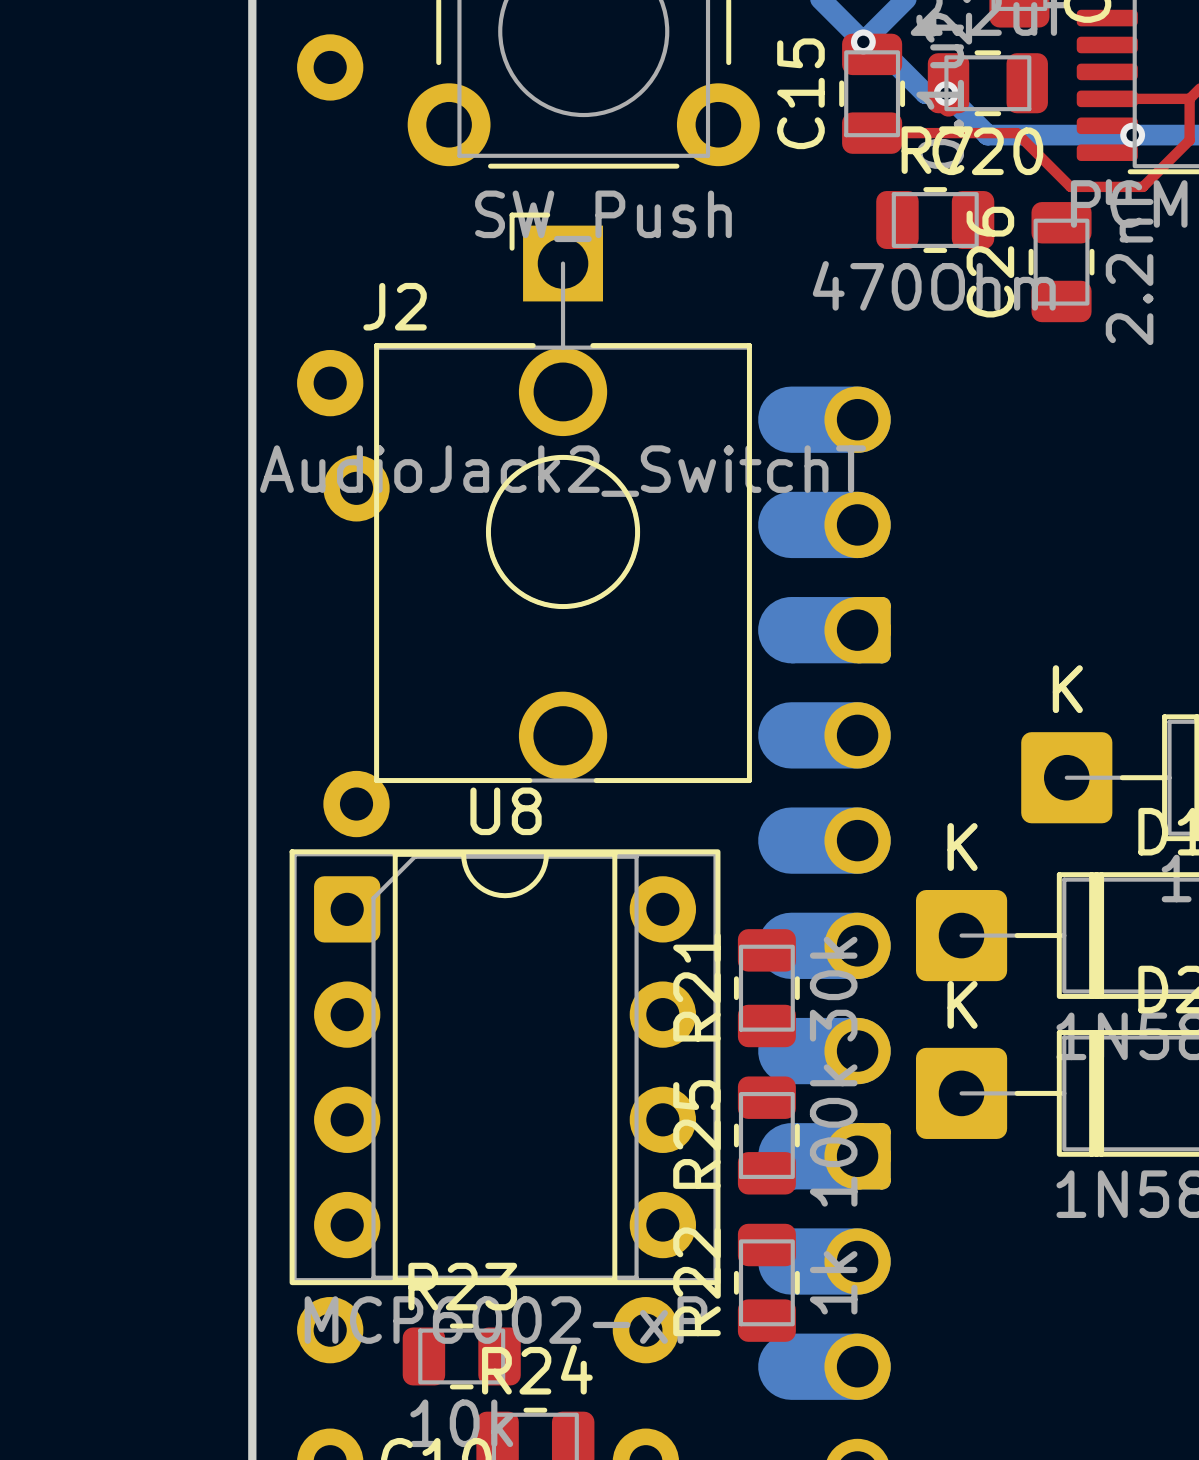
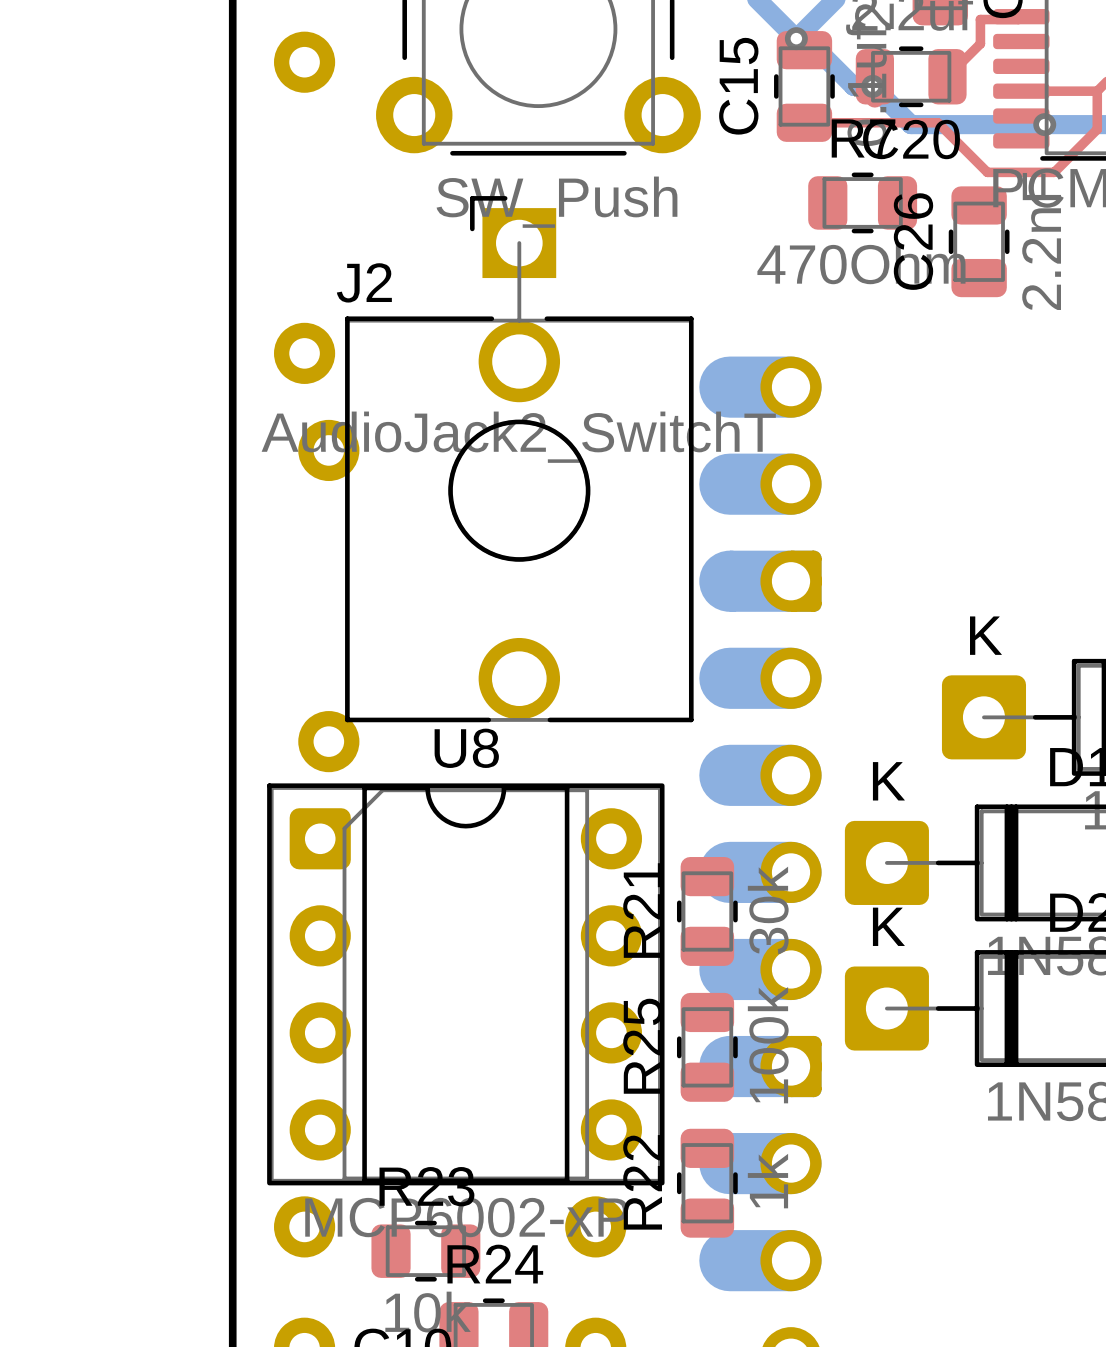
top track: none -> (1021, 16) (1018, 19) (980, 19) (980, 43) (947, 76)

